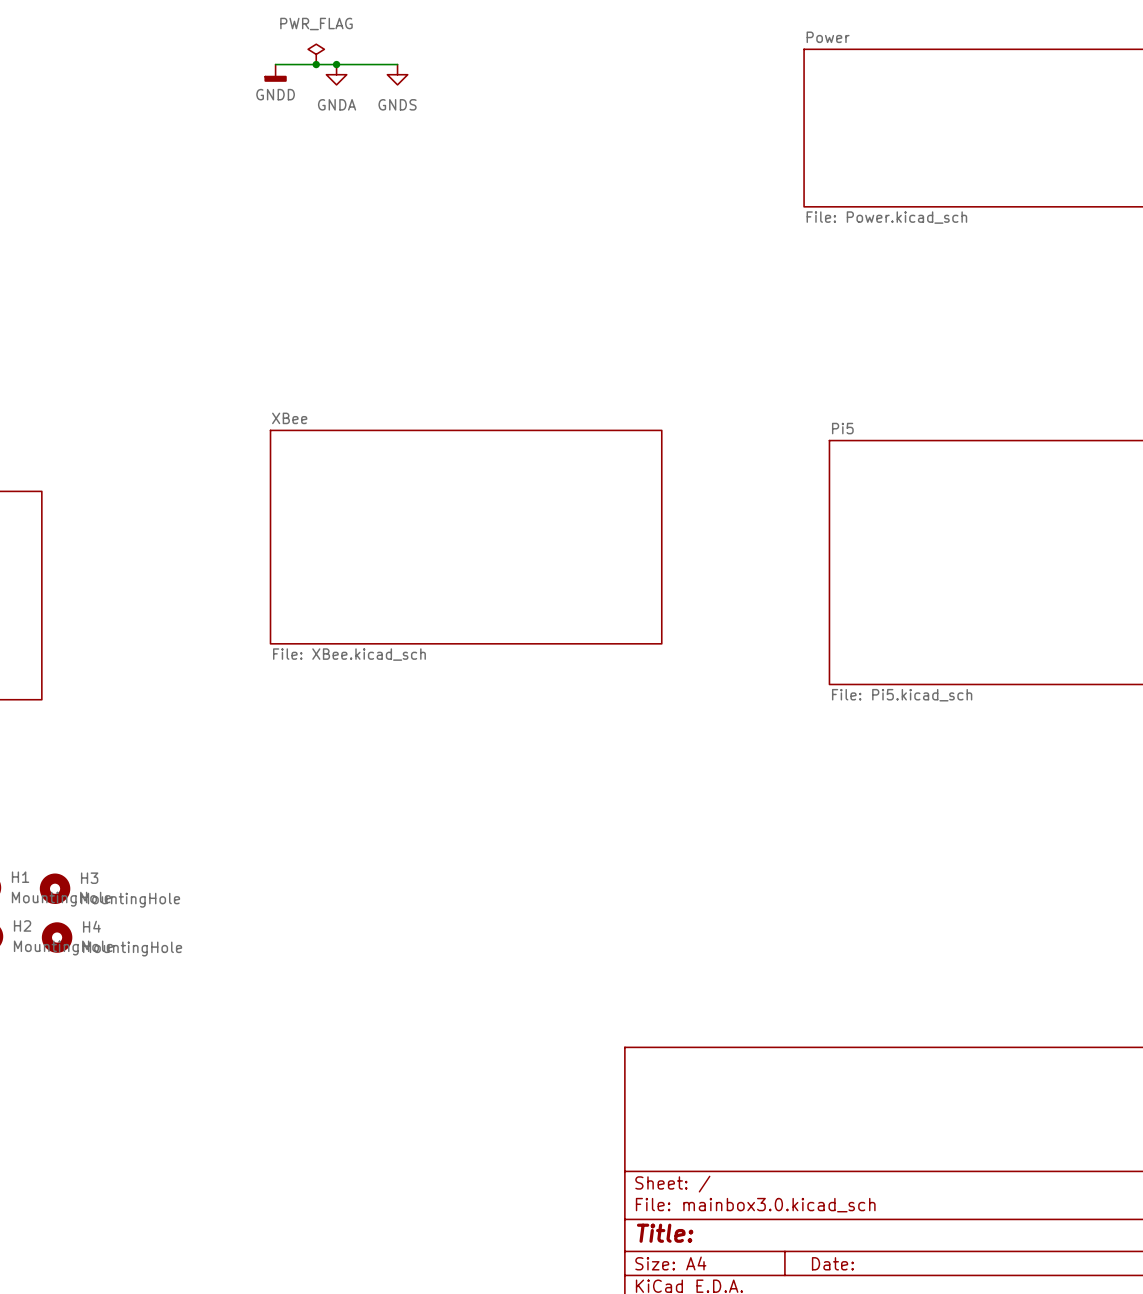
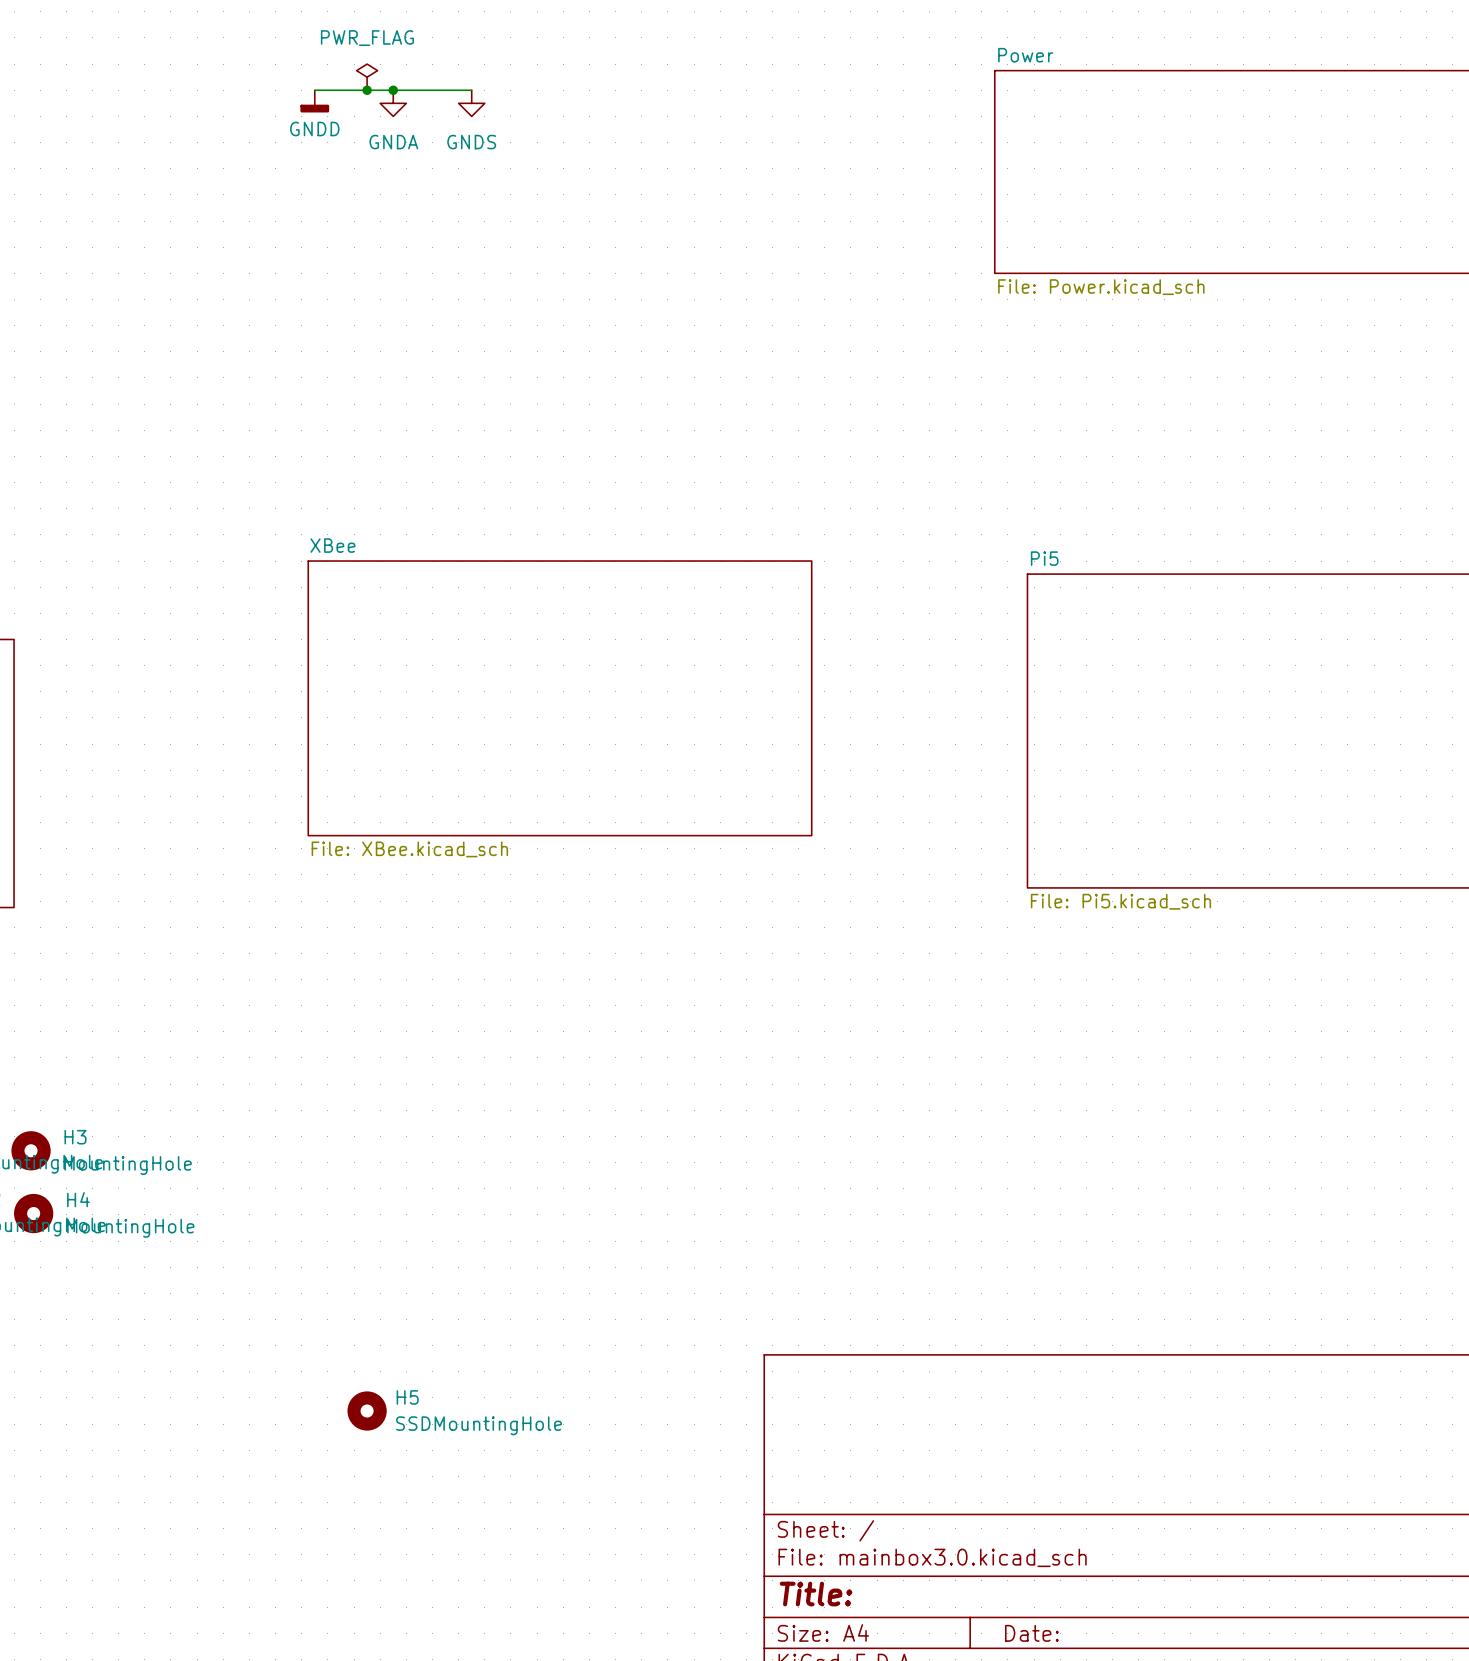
H5: none -> SSDMountingHole (367, 1411)

